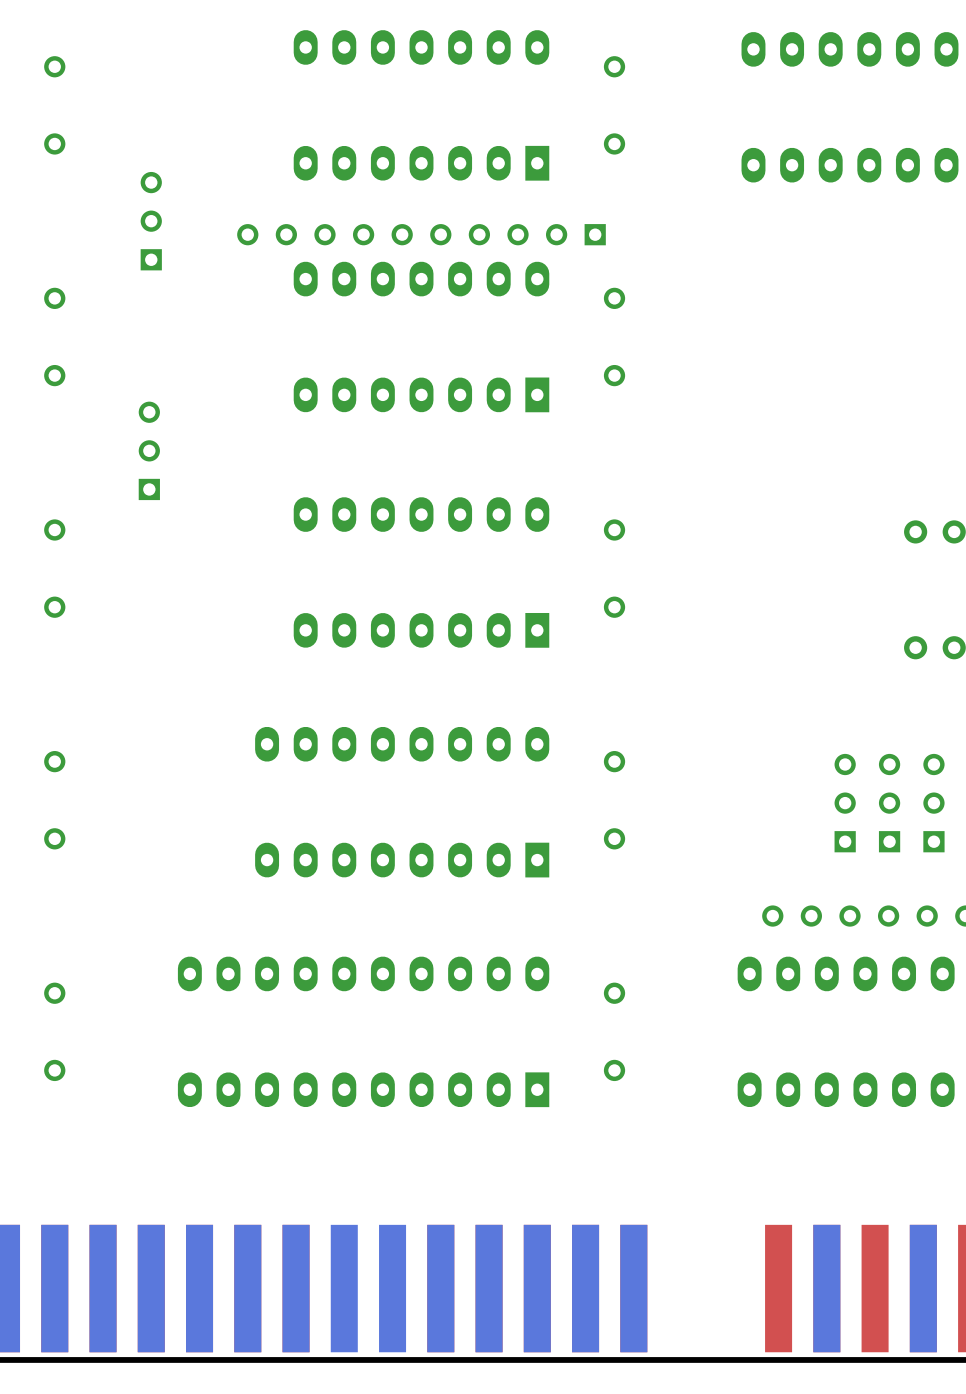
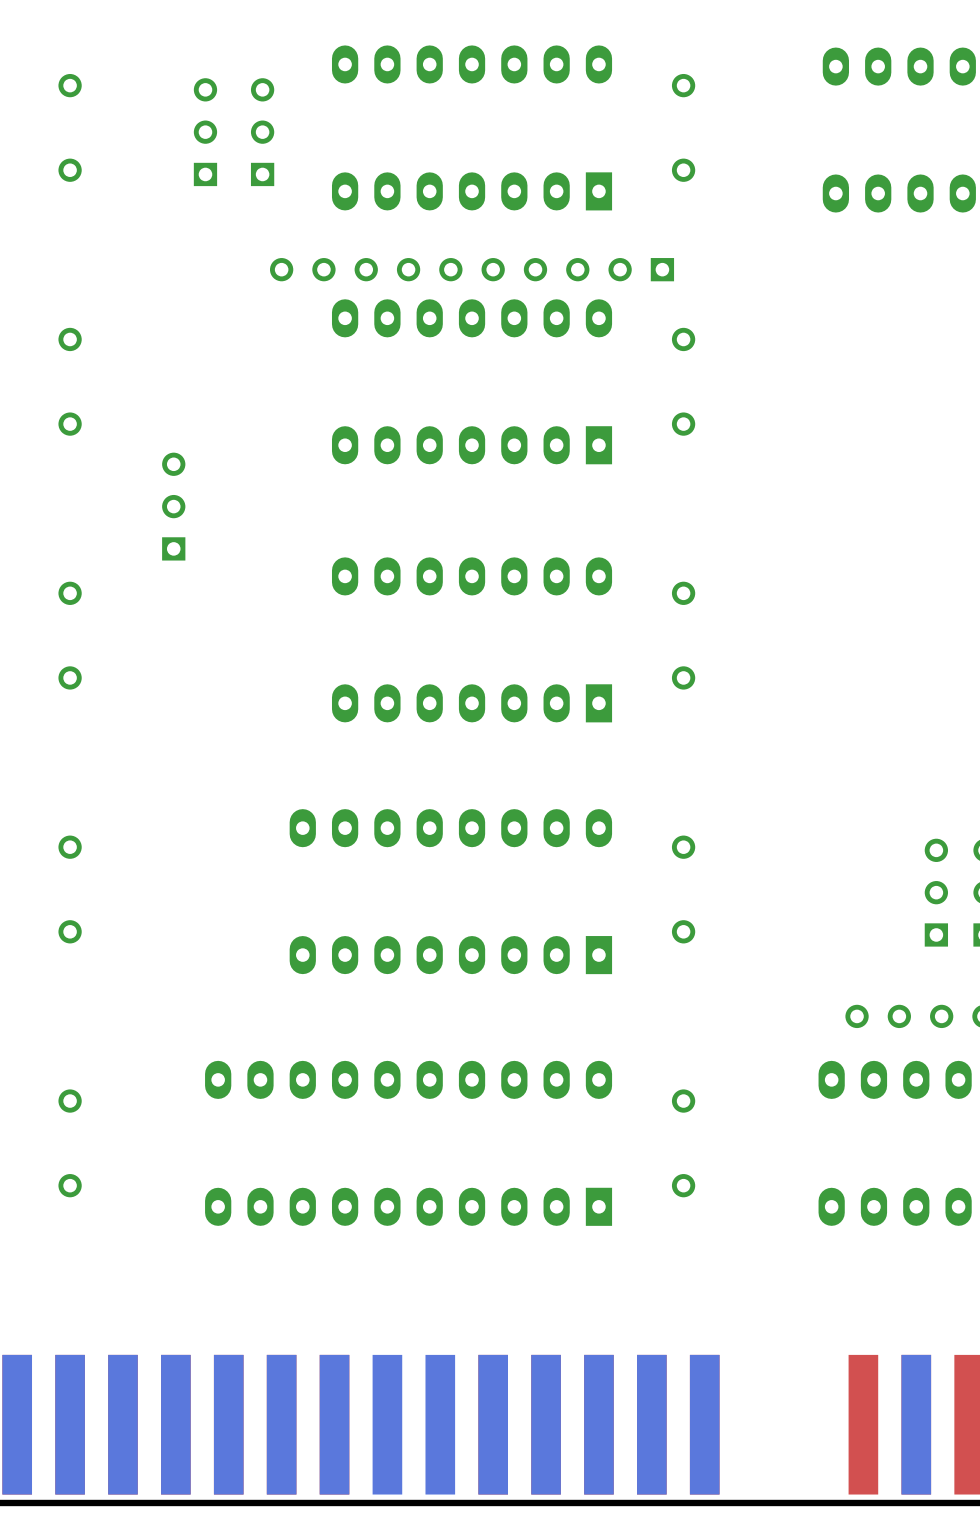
part: none -> (205, 132)
part: none -> (262, 132)
part: (151, 221) -> none

